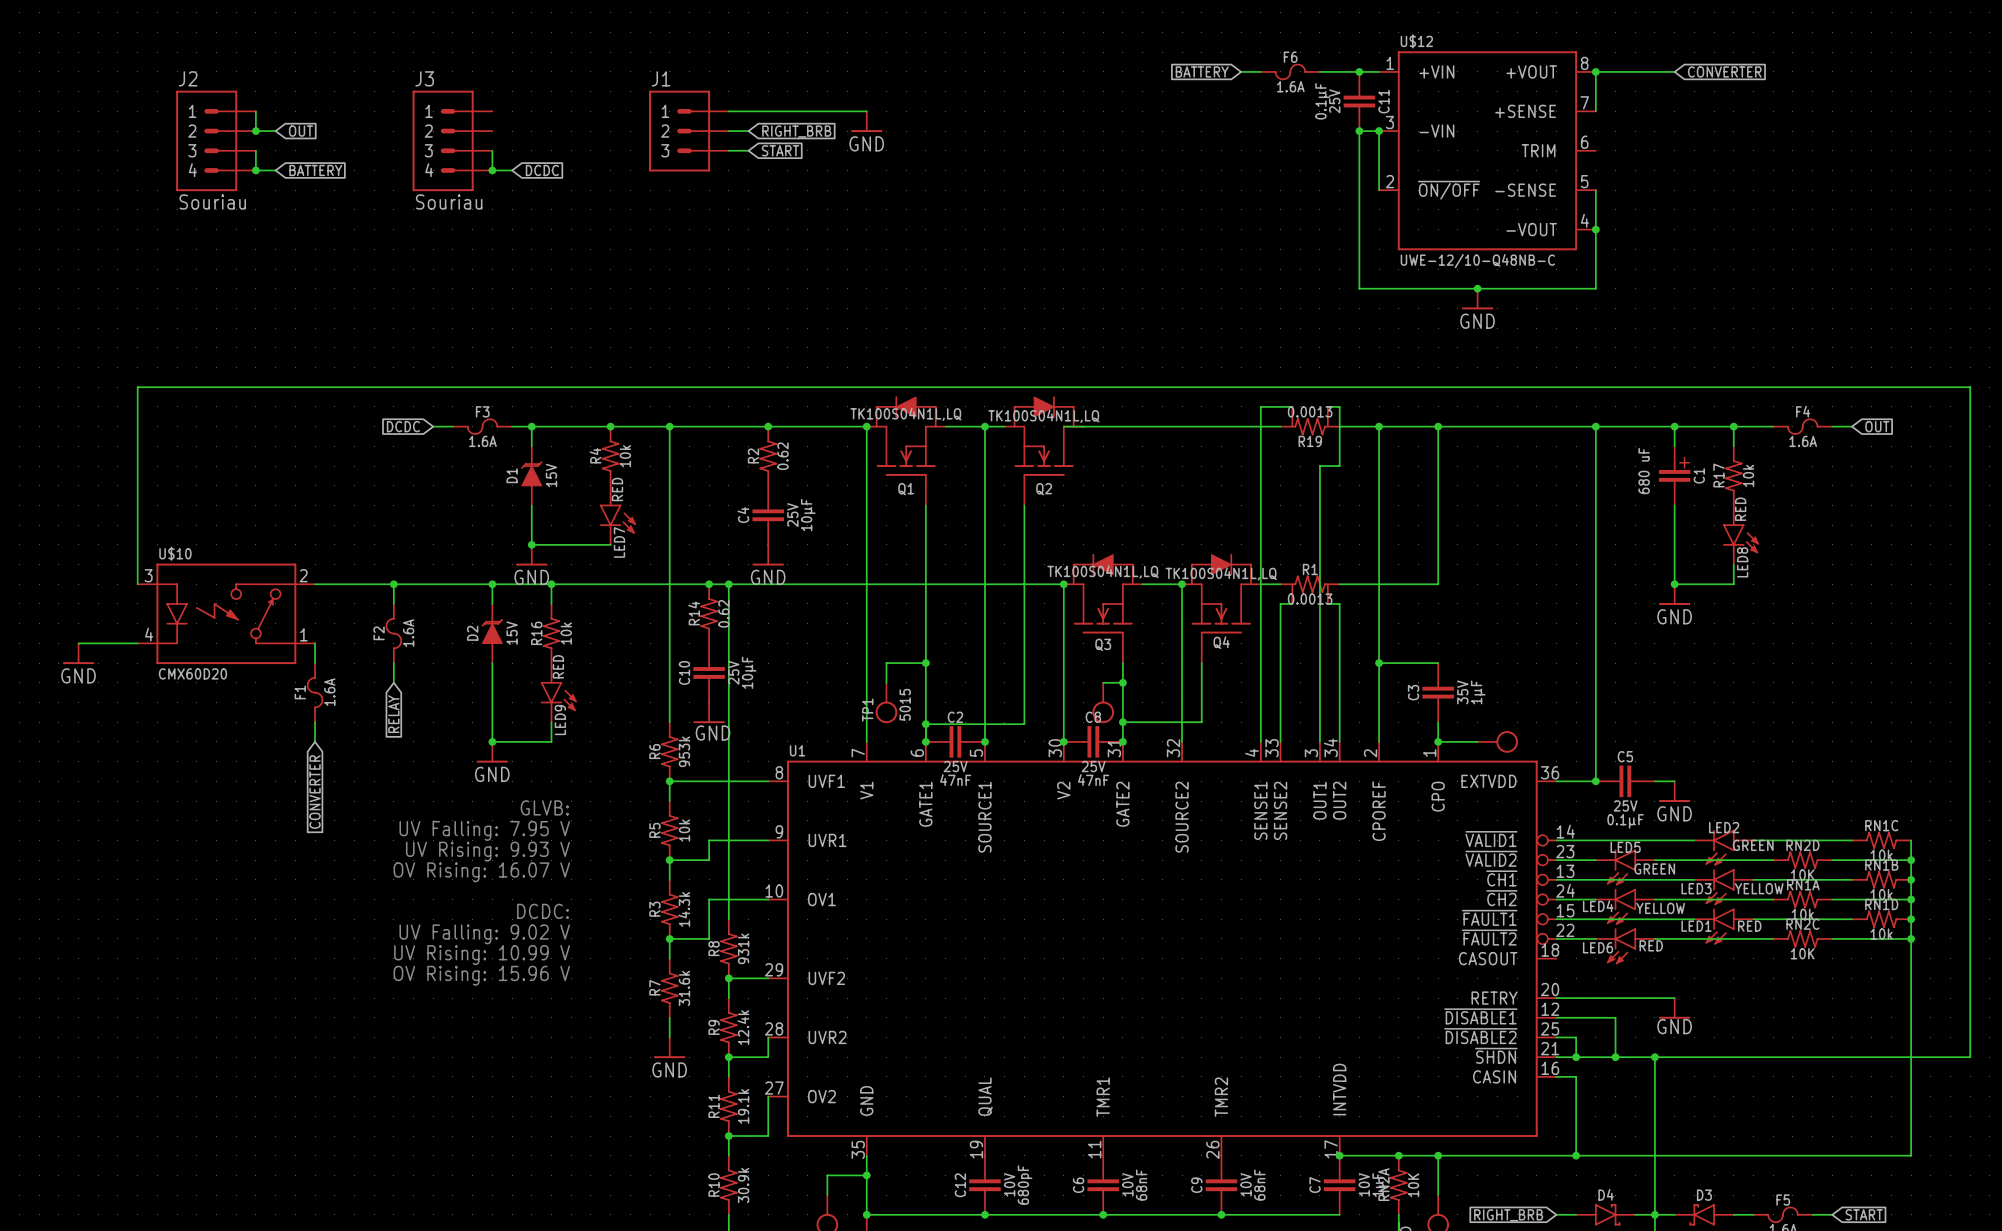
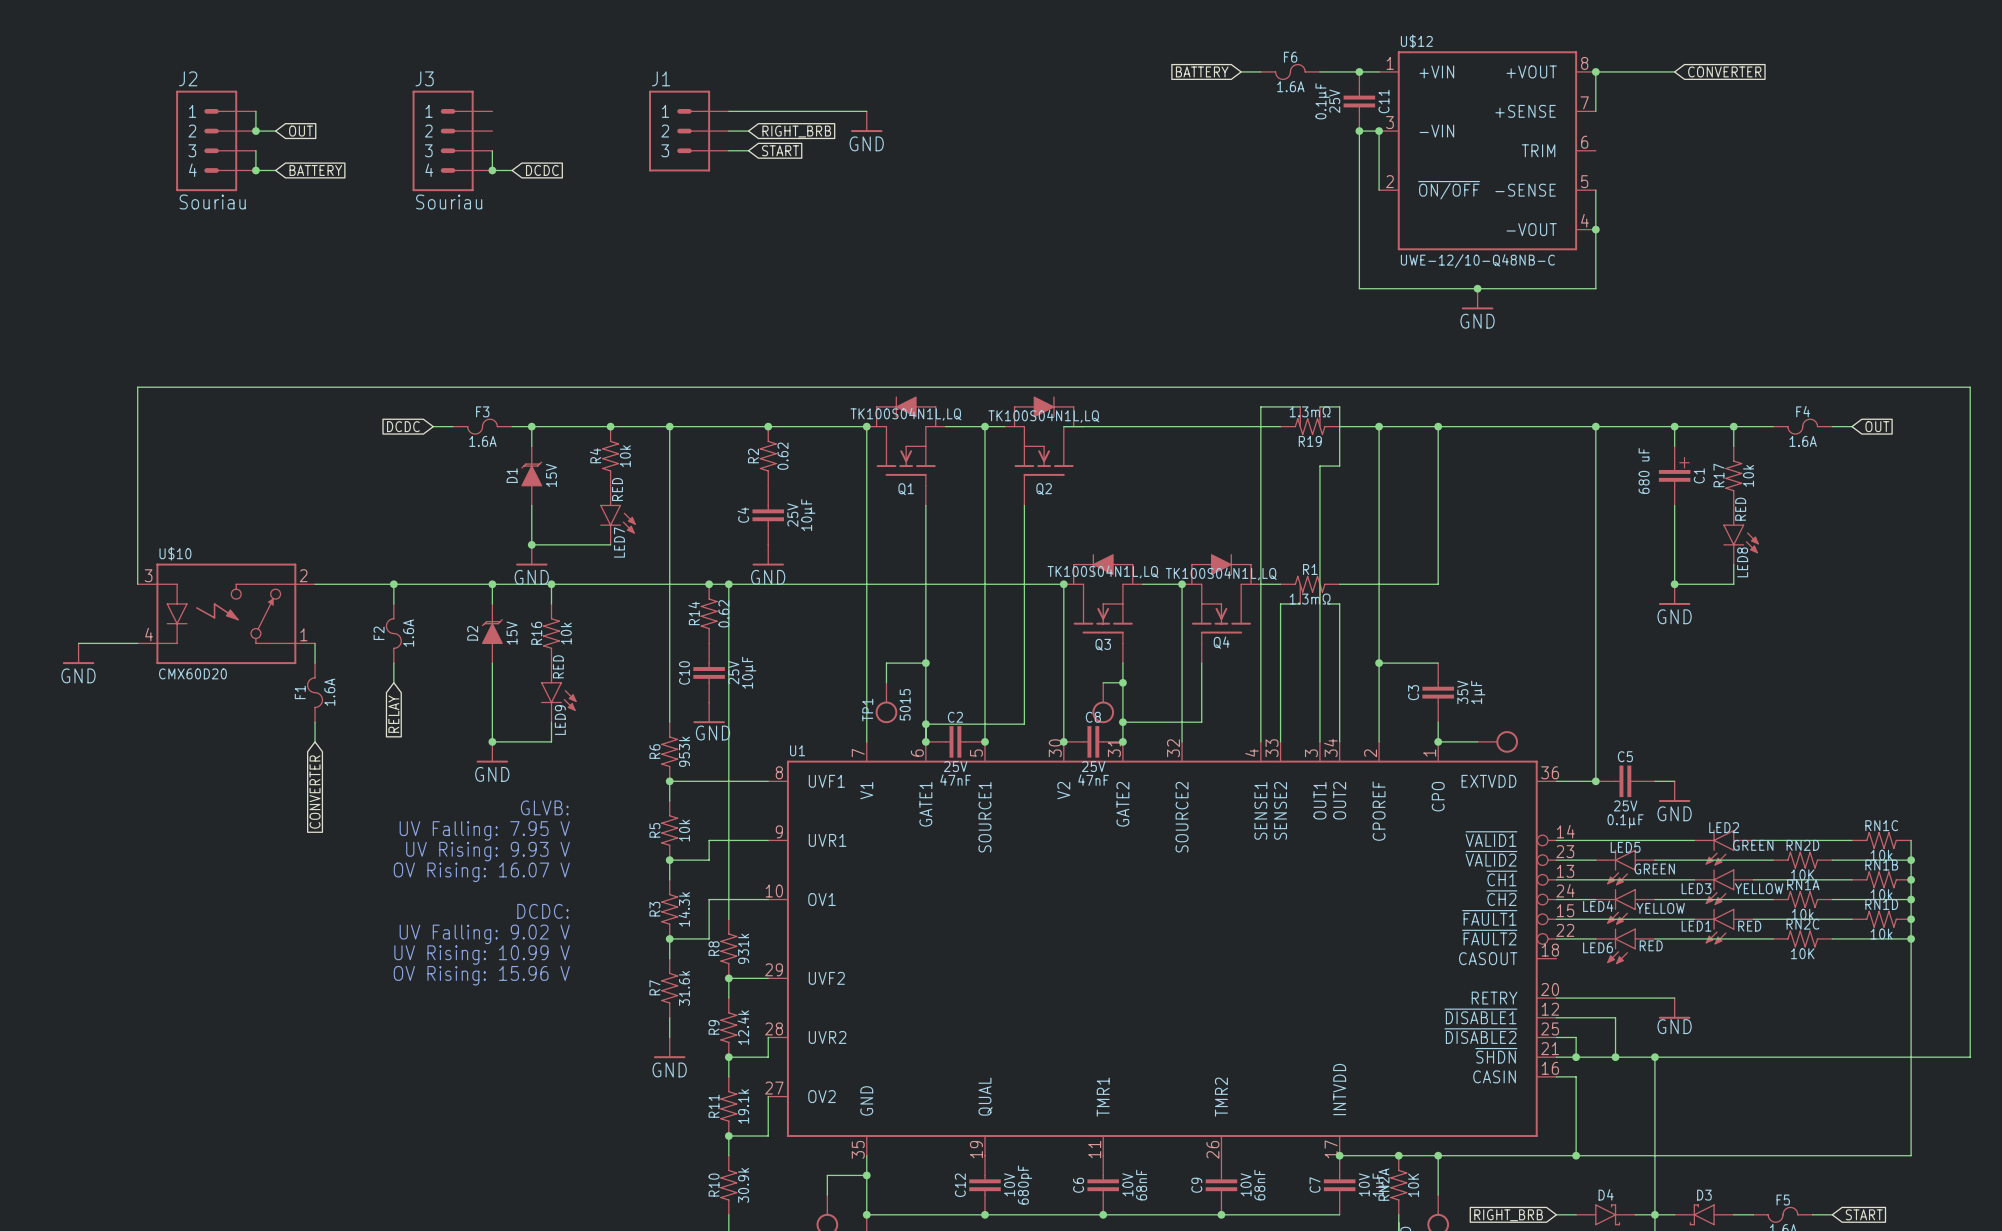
R19 symbol: [1279, 406, 1341, 436] -> [1279, 406, 1341, 436]
wire: none -> (1292, 406) (1300, 406)
wire: none -> (1319, 406) (1327, 406)
R19 text: 0.0013 (1310, 411) -> 1.3mΩ (1310, 411)
R1 symbol: [1279, 575, 1341, 604] -> [1279, 575, 1341, 604]
R1 text: 0.0013 (1310, 599) -> 1.3mΩ (1310, 599)
wire: none -> (1292, 603) (1300, 603)

